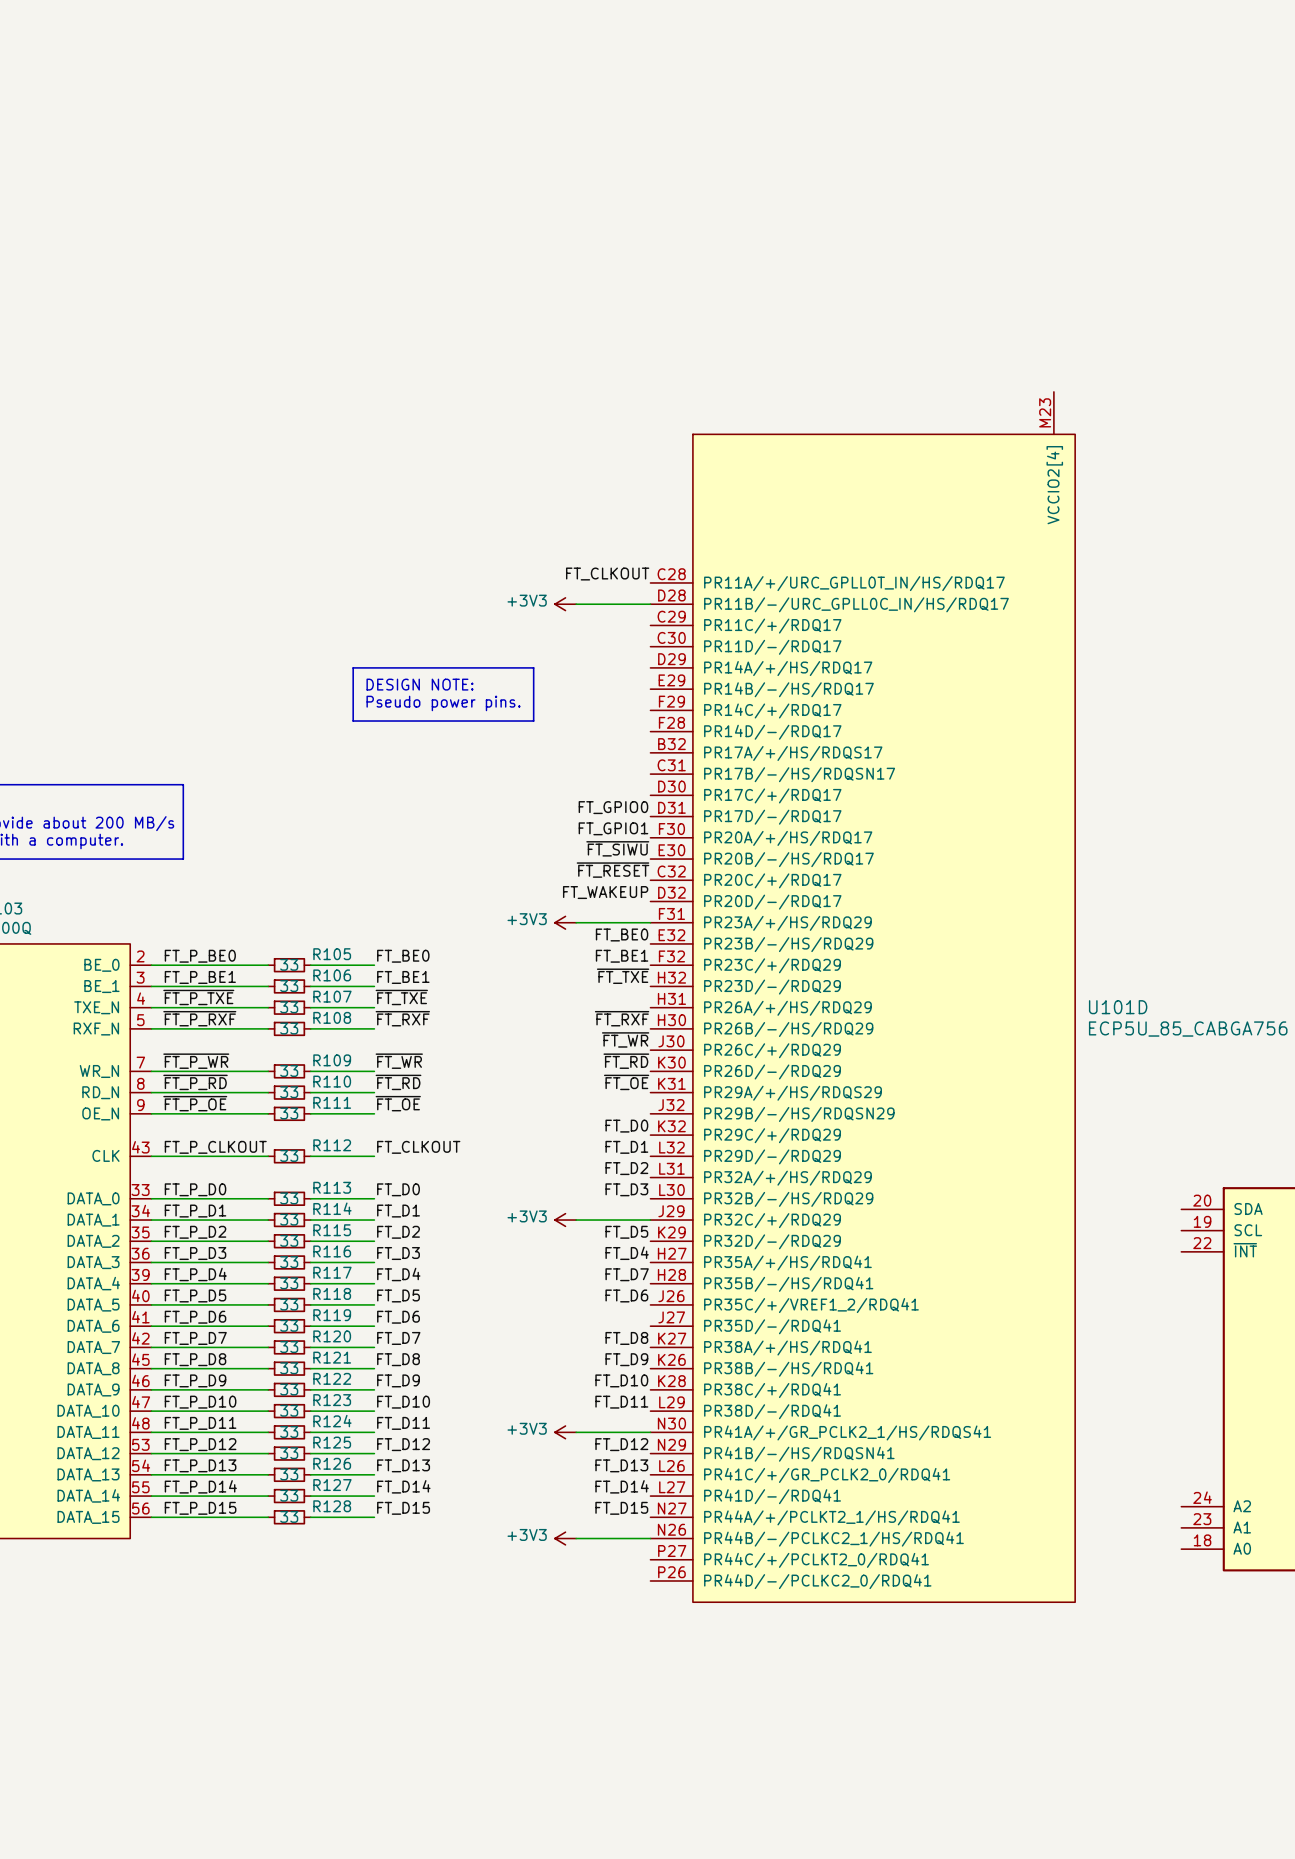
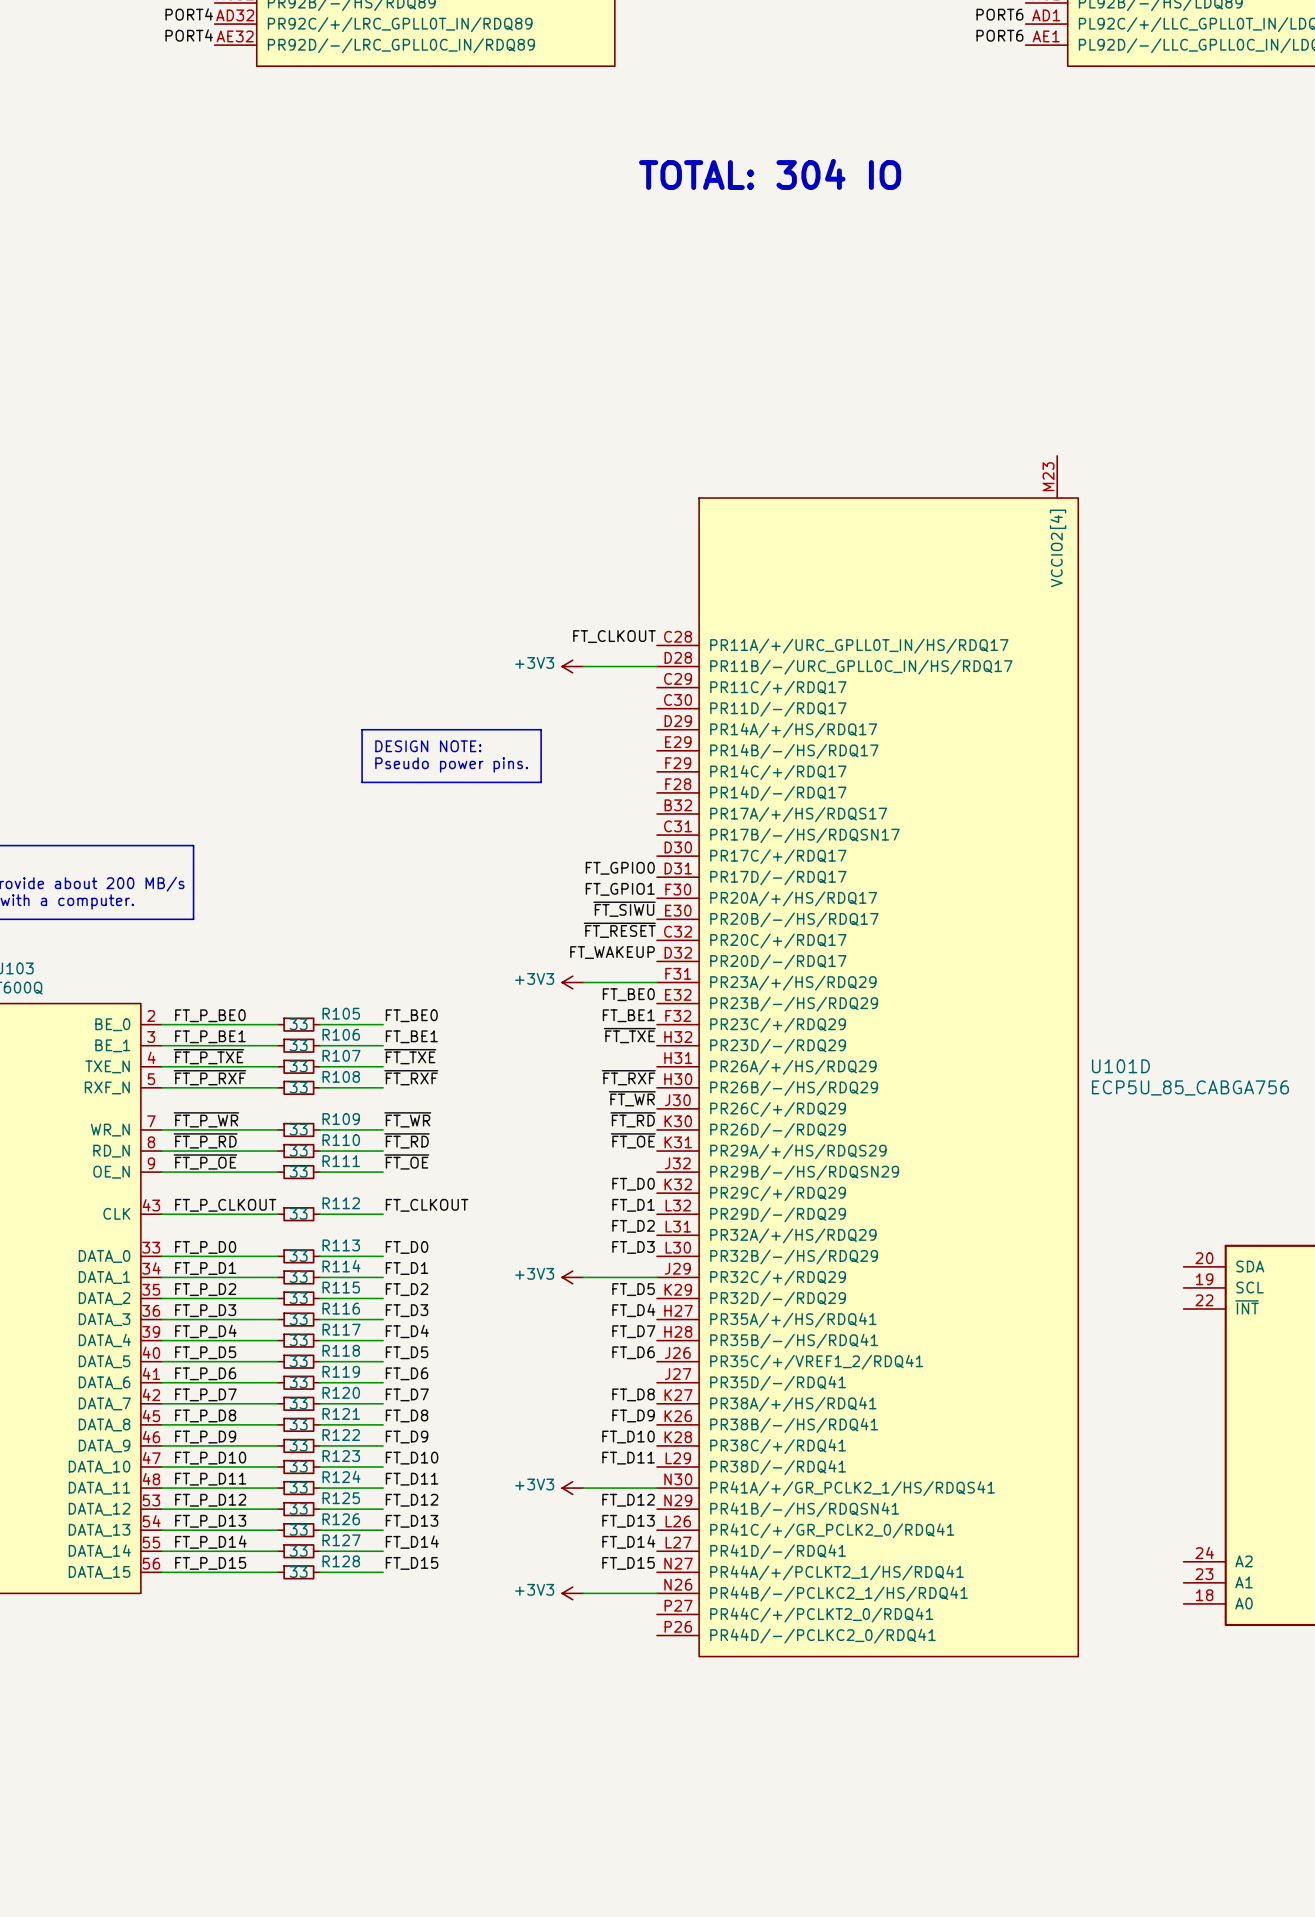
text: none -> TOTAL: 304 IO (770, 174)

